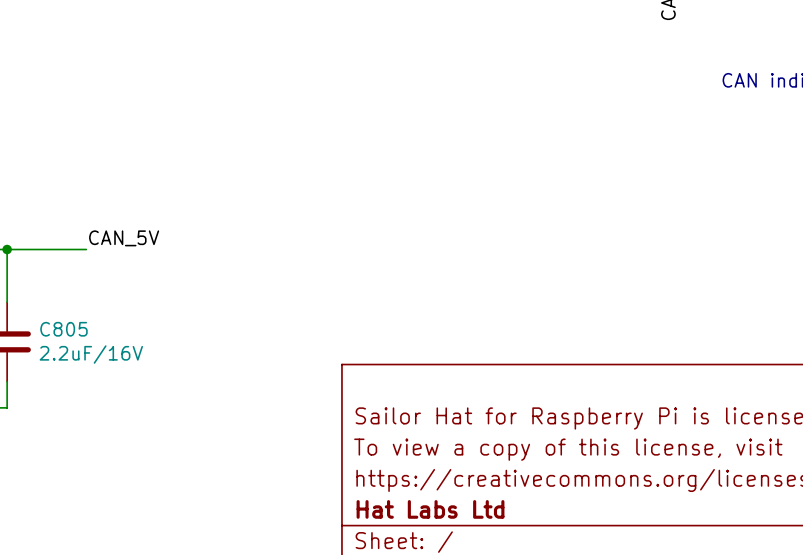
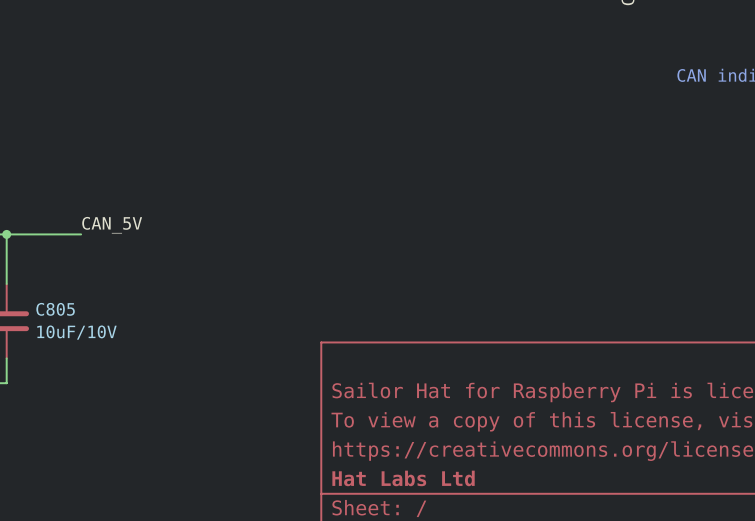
C805 value: 2.2uF/16V (91, 354) -> 10uF/10V (76, 332)

